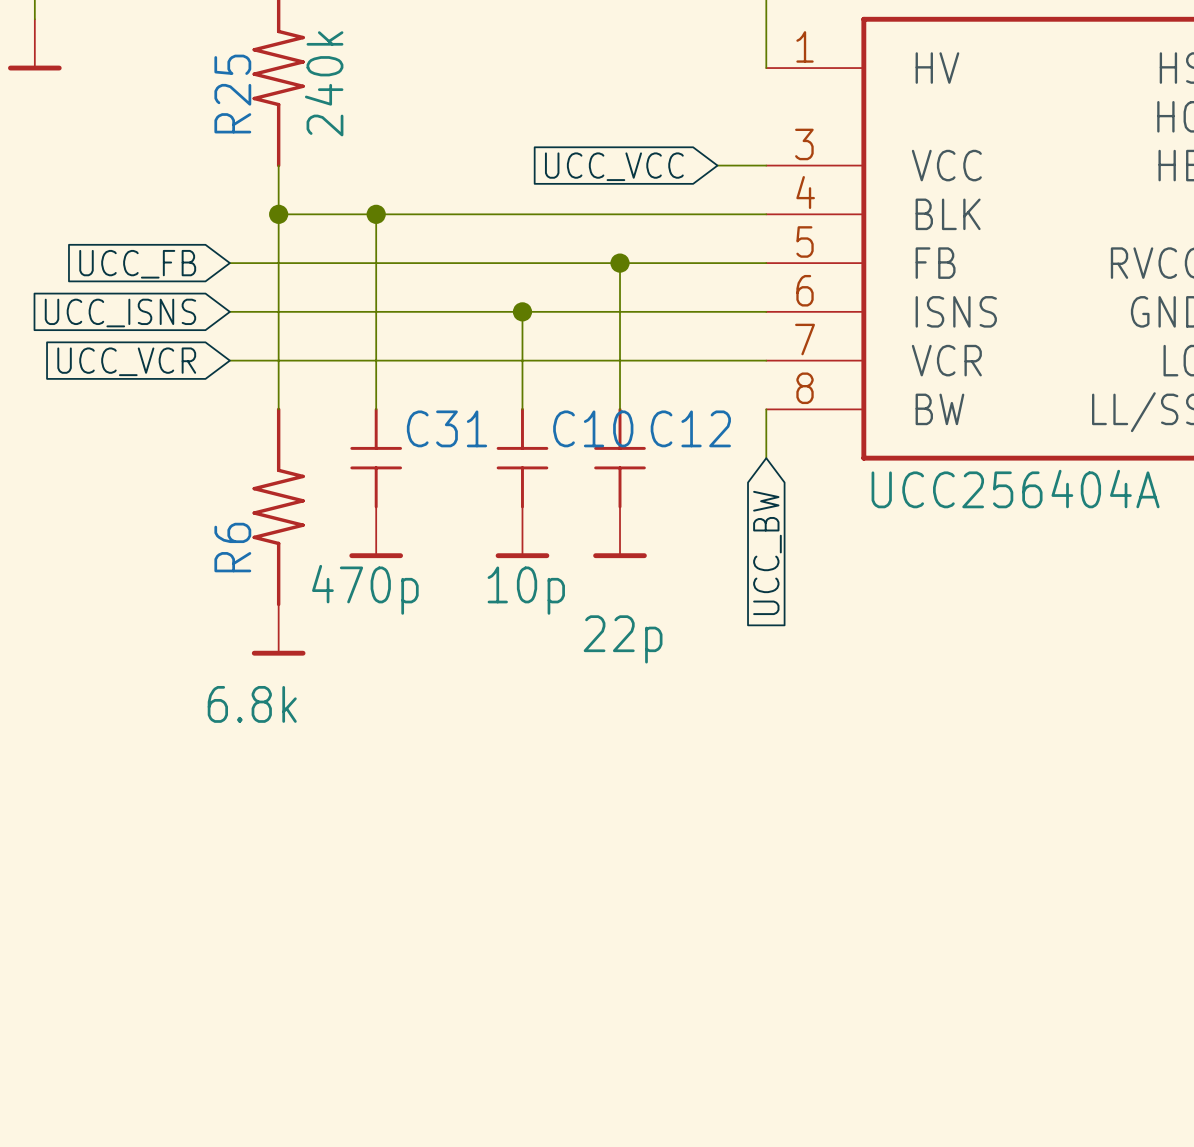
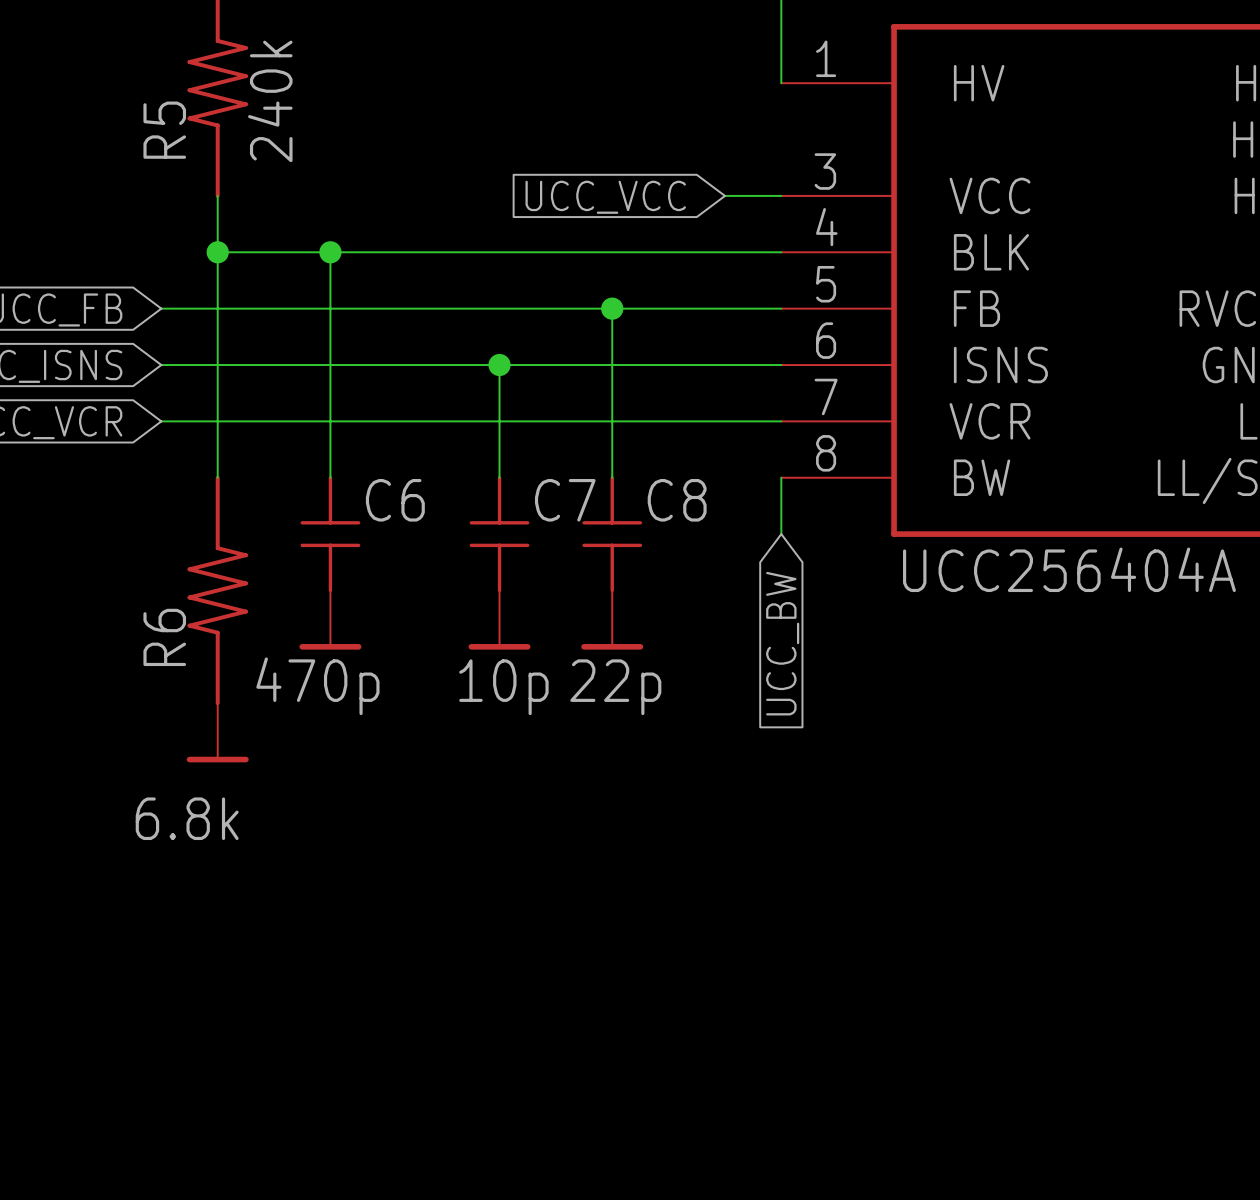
R25 name: R25 (232, 94) -> R5 (164, 130)
C31 name: C31 (446, 428) -> C6 (395, 500)
C10 name: C10 (593, 428) -> C7 (565, 500)
C12 name: C12 (690, 428) -> C8 (677, 500)
C12 value position: 22p (623, 639) -> 22p (615, 687)

